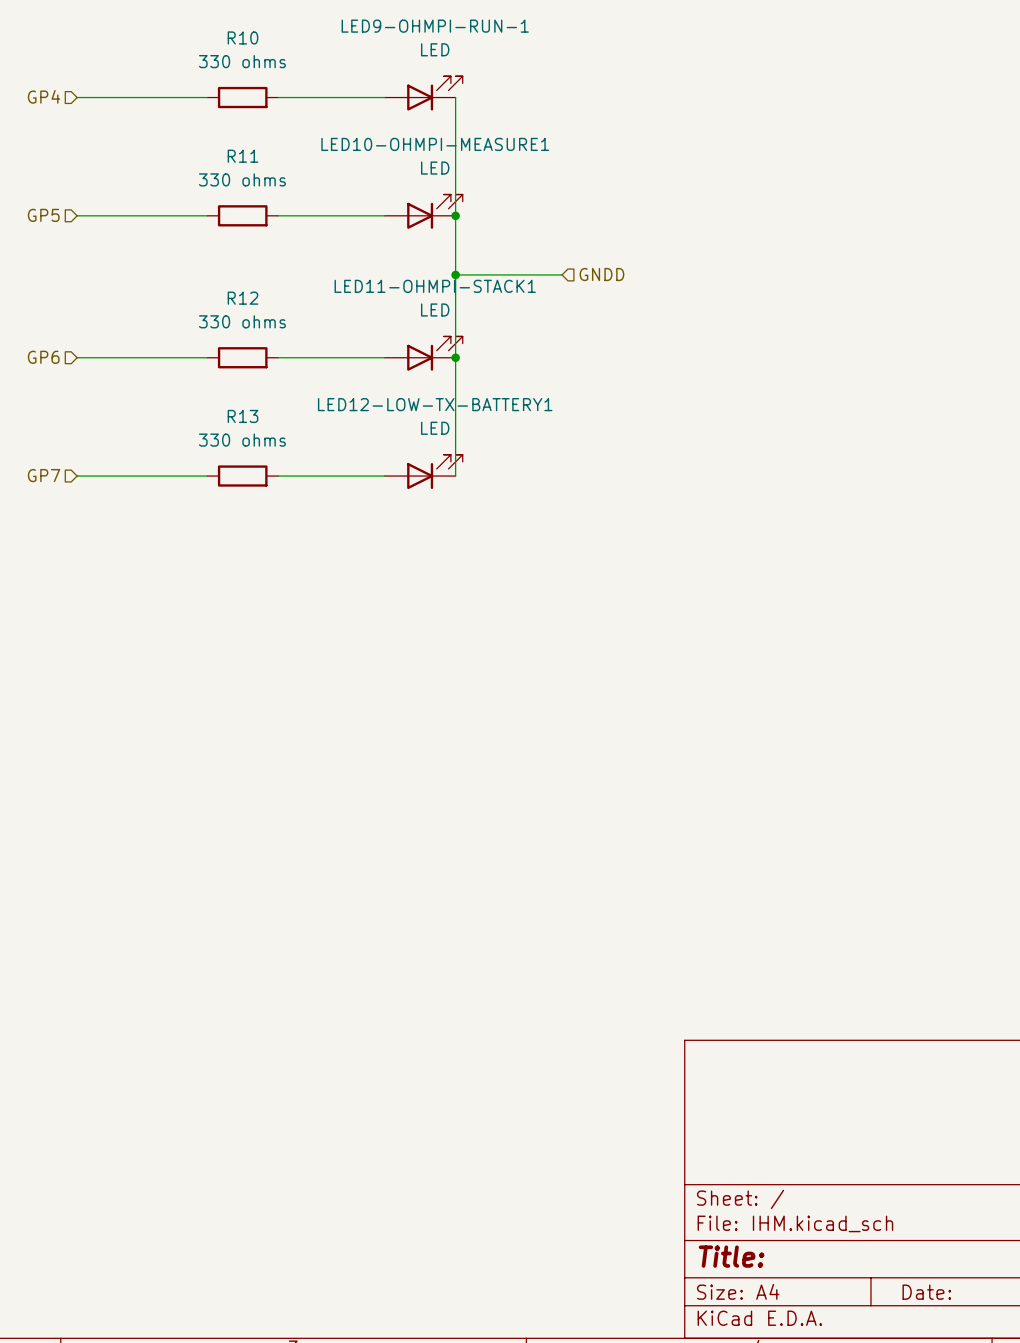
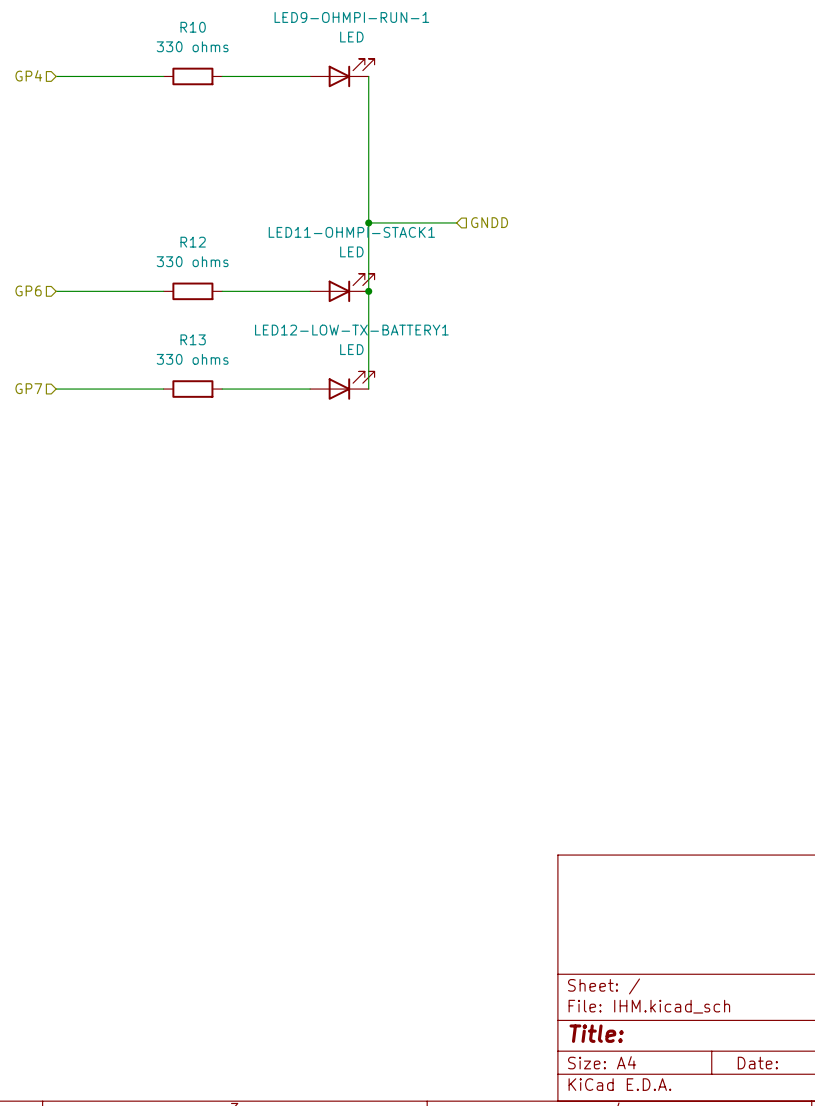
LED10-OHMPI-MEASURE1: LED (423, 211) -> none
hierarchical label: GP5 (43, 215) -> none
wire: (77, 215) (207, 215) -> none
R11: 330 ohms (242, 215) -> none
wire: (278, 215) (384, 215) -> none
junction: (455, 215) -> none

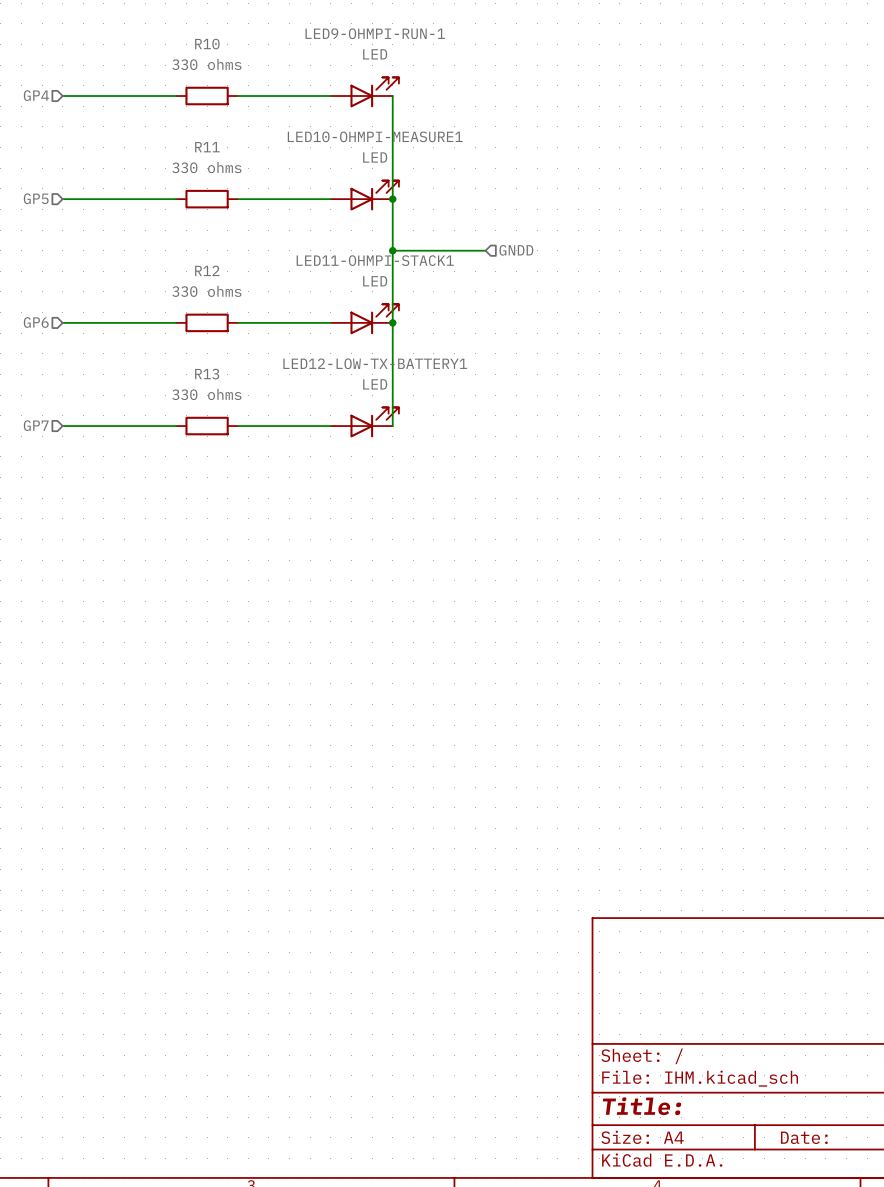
LED10-OHMPI-MEASURE1: none -> LED (364, 195)
hierarchical label: none -> GP5 (36, 198)
wire: none -> (62, 199) (176, 199)
R11: none -> 330 ohms (207, 199)
wire: none -> (238, 199) (330, 199)
junction: none -> (392, 199)

